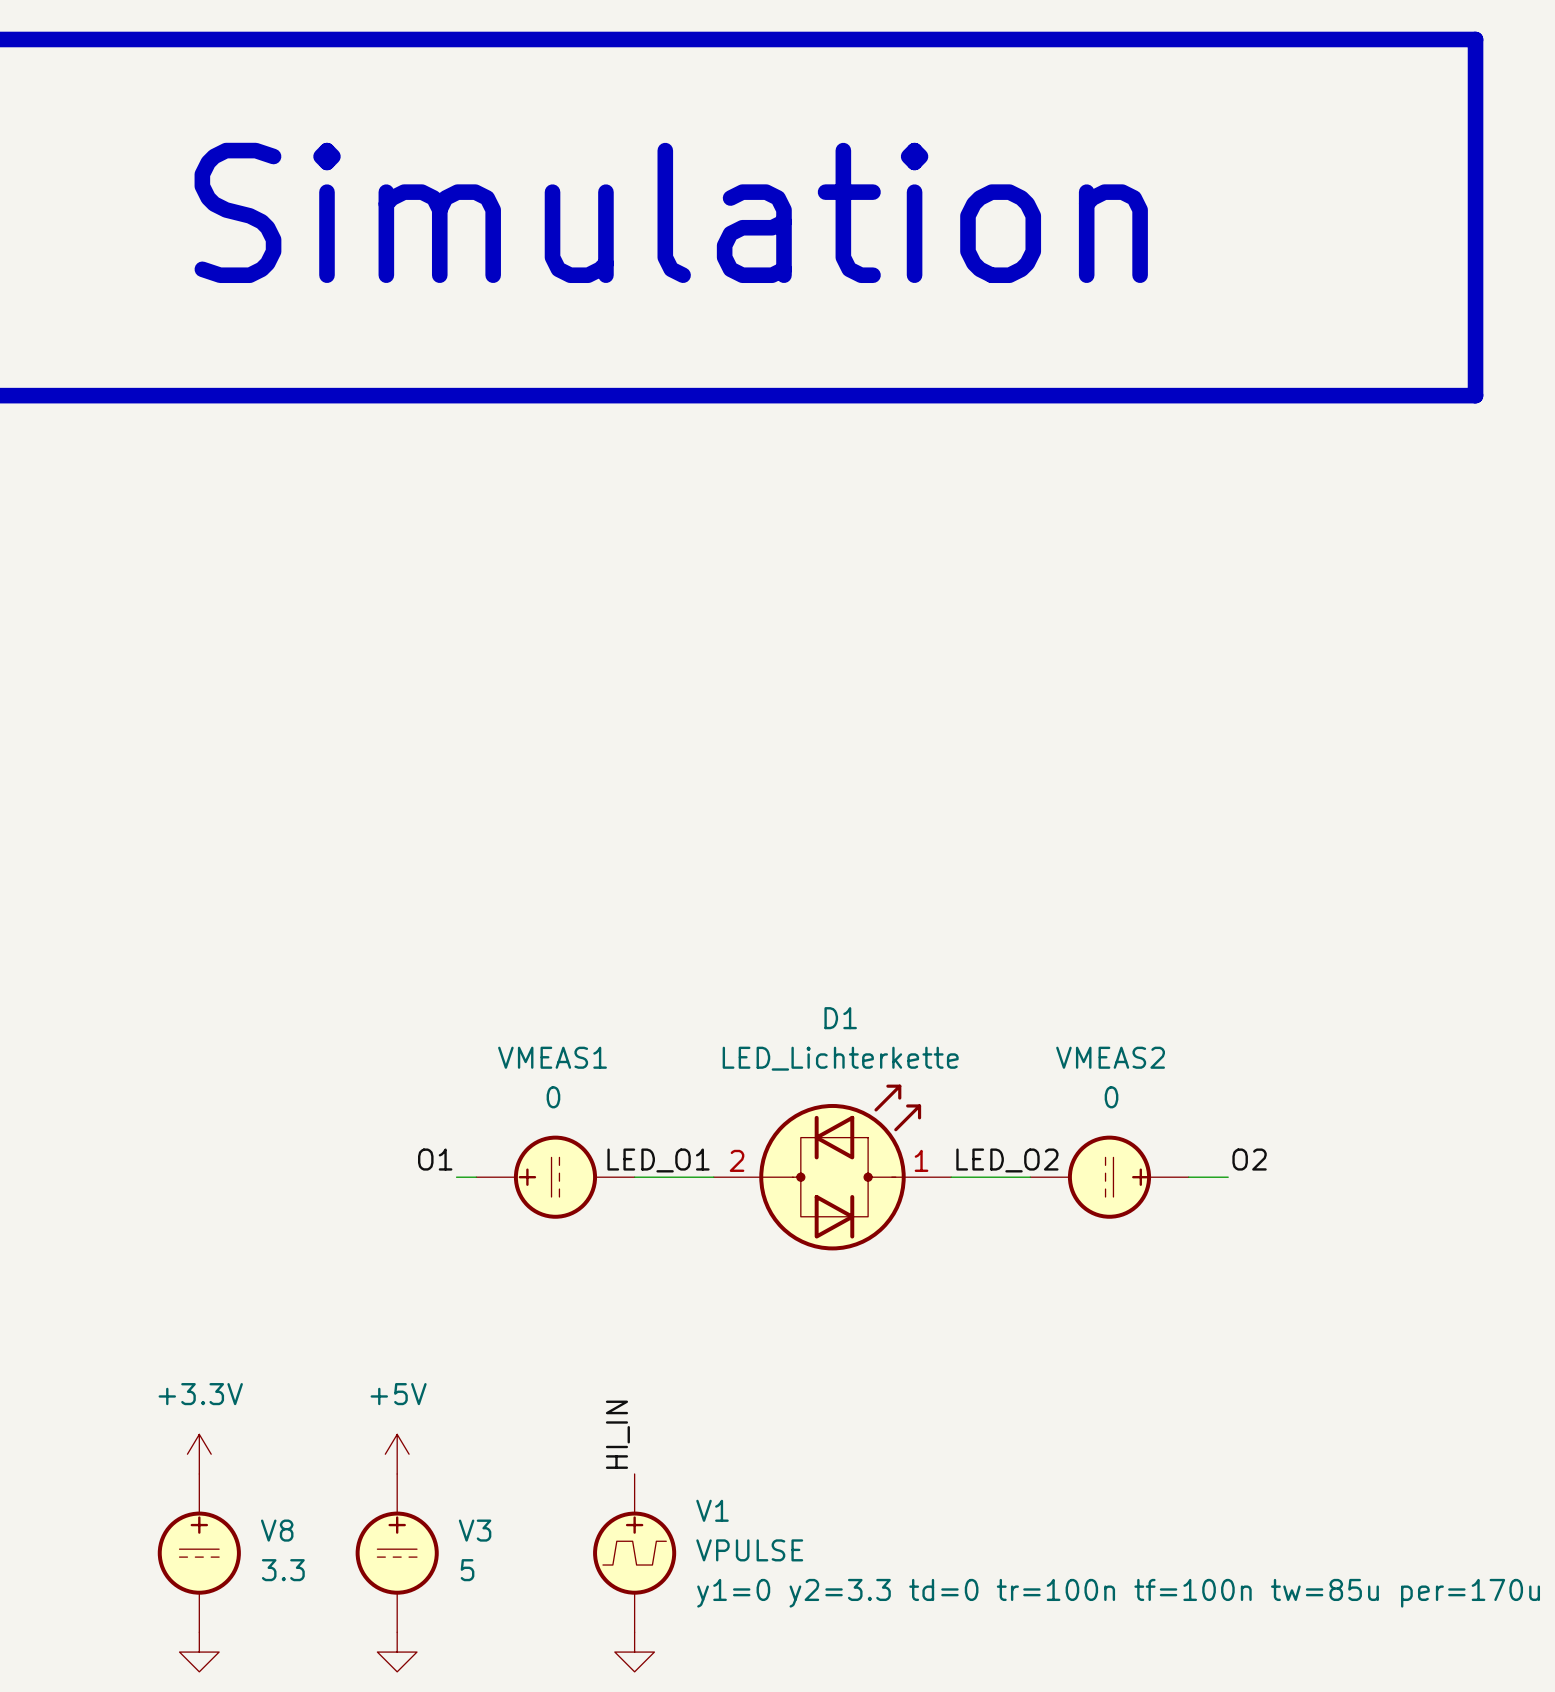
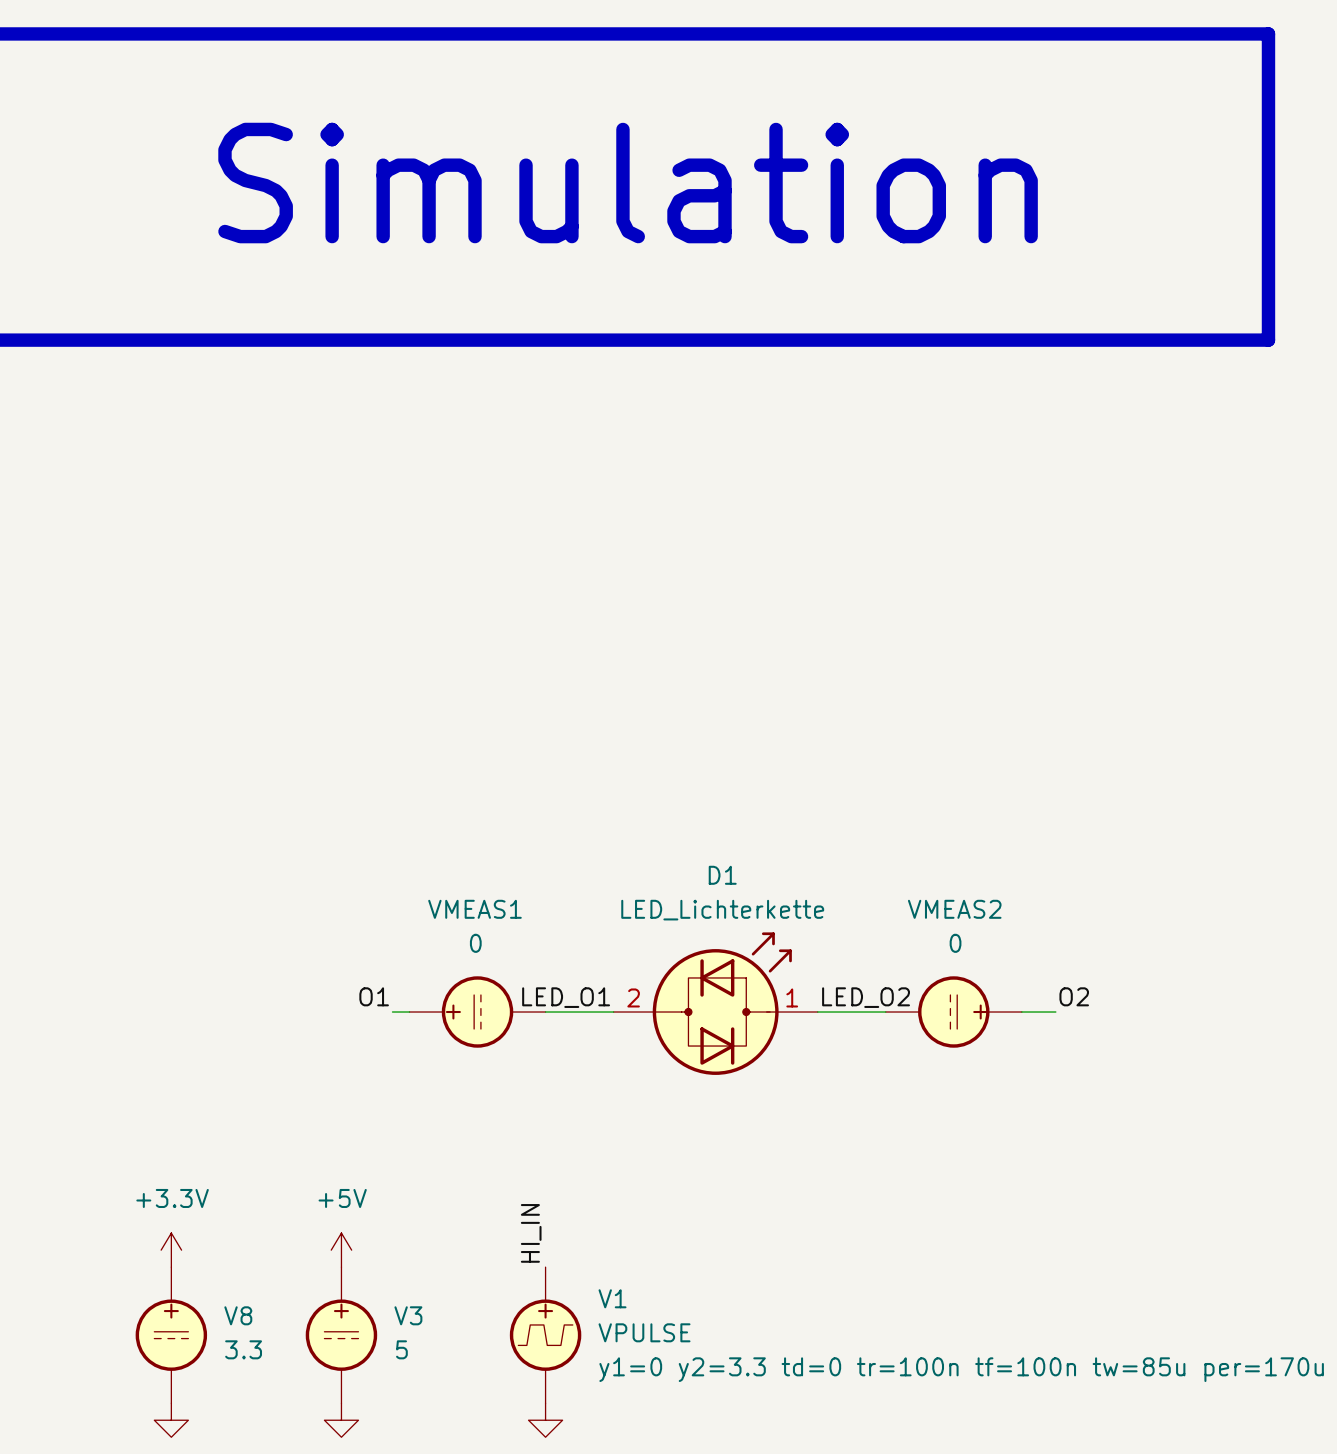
text position: Simulation (671, 212) -> Simulation (628, 183)

